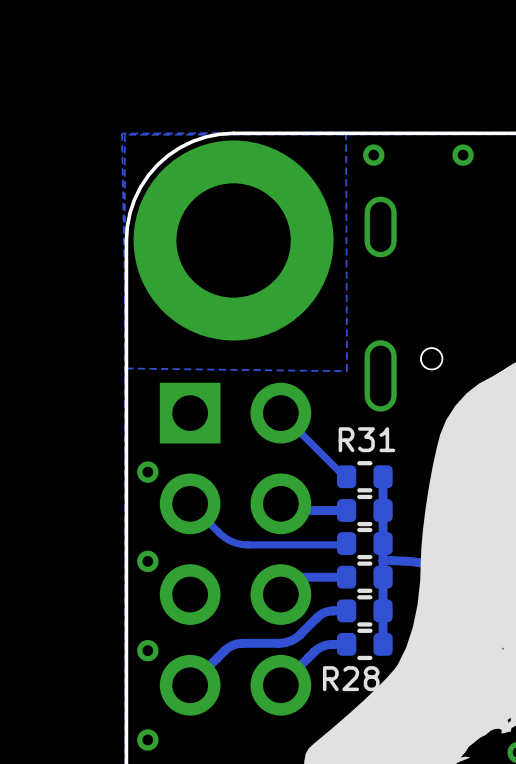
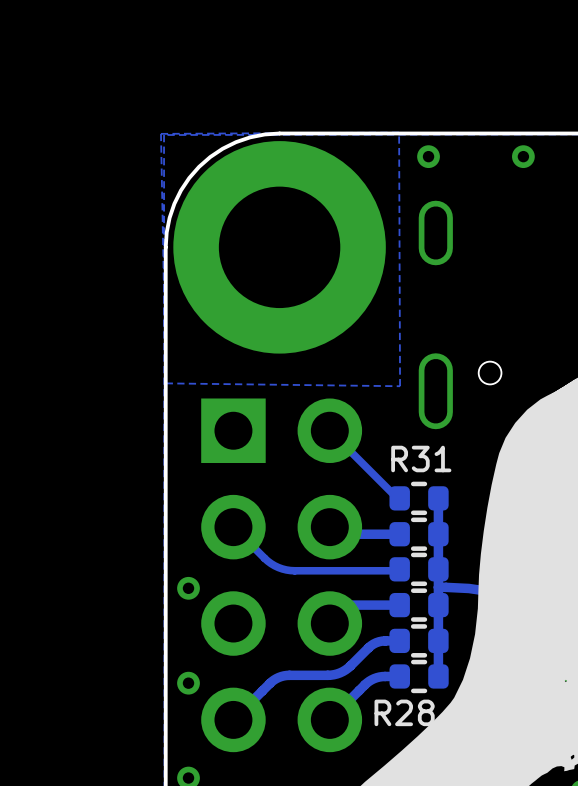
via: (147, 472) -> none

